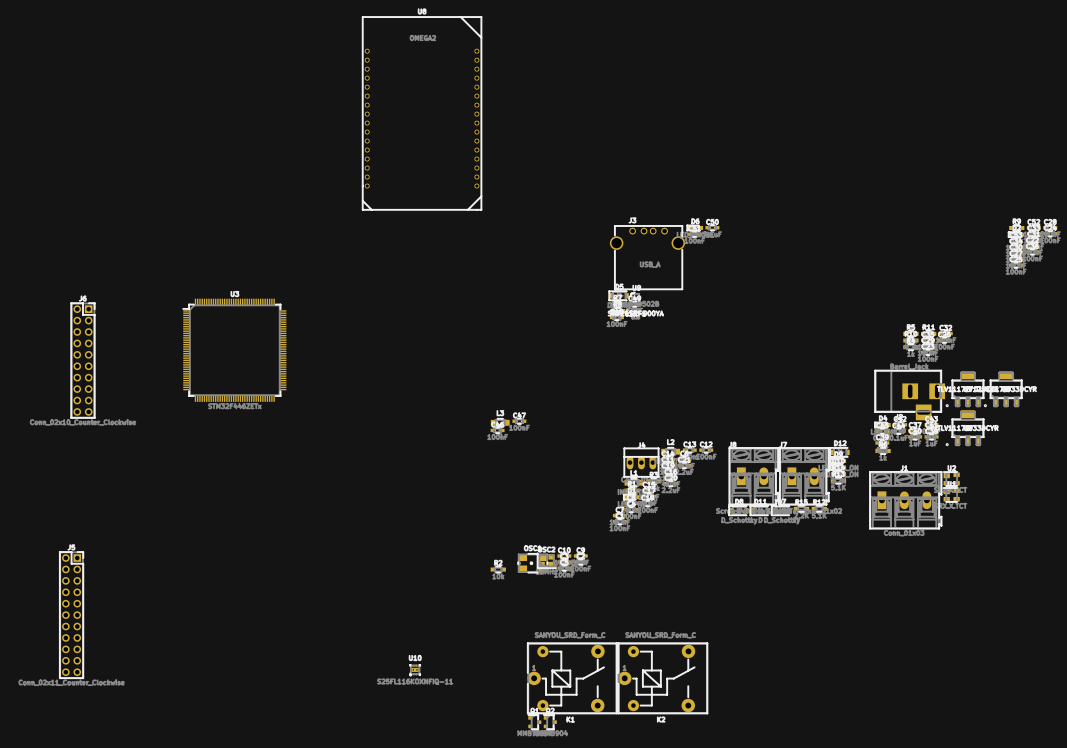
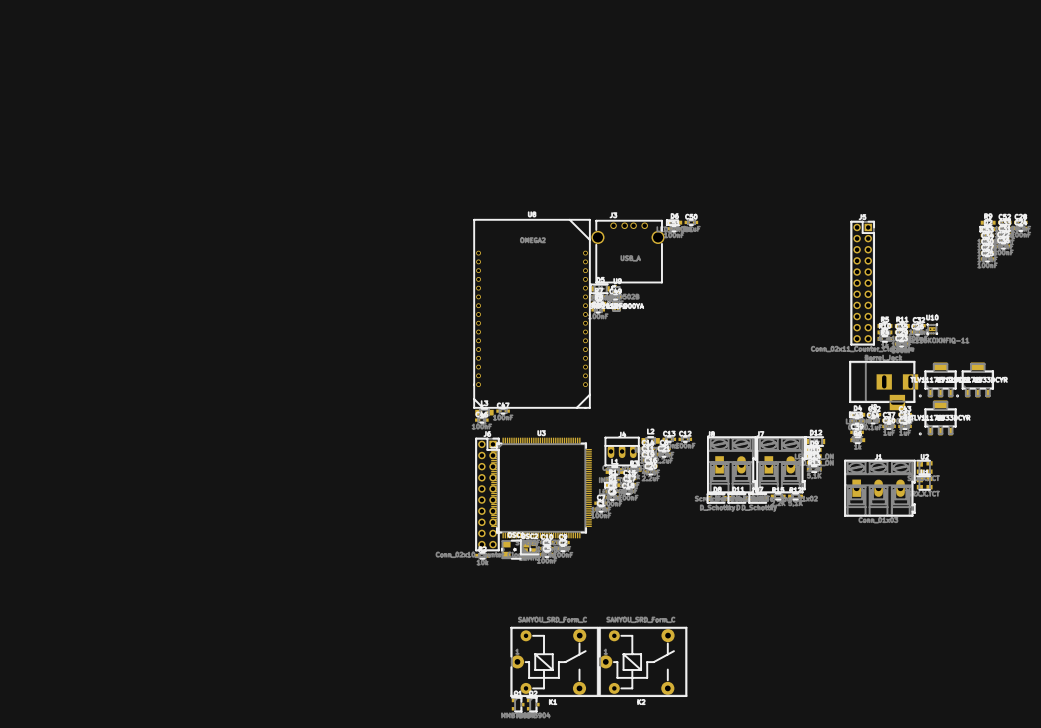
part position: (422, 113) -> (532, 313)
part position: (234, 350) -> (541, 488)
part position: (82, 360) -> (487, 494)
part position: (71, 615) -> (862, 283)
part position: (415, 670) -> (932, 329)

